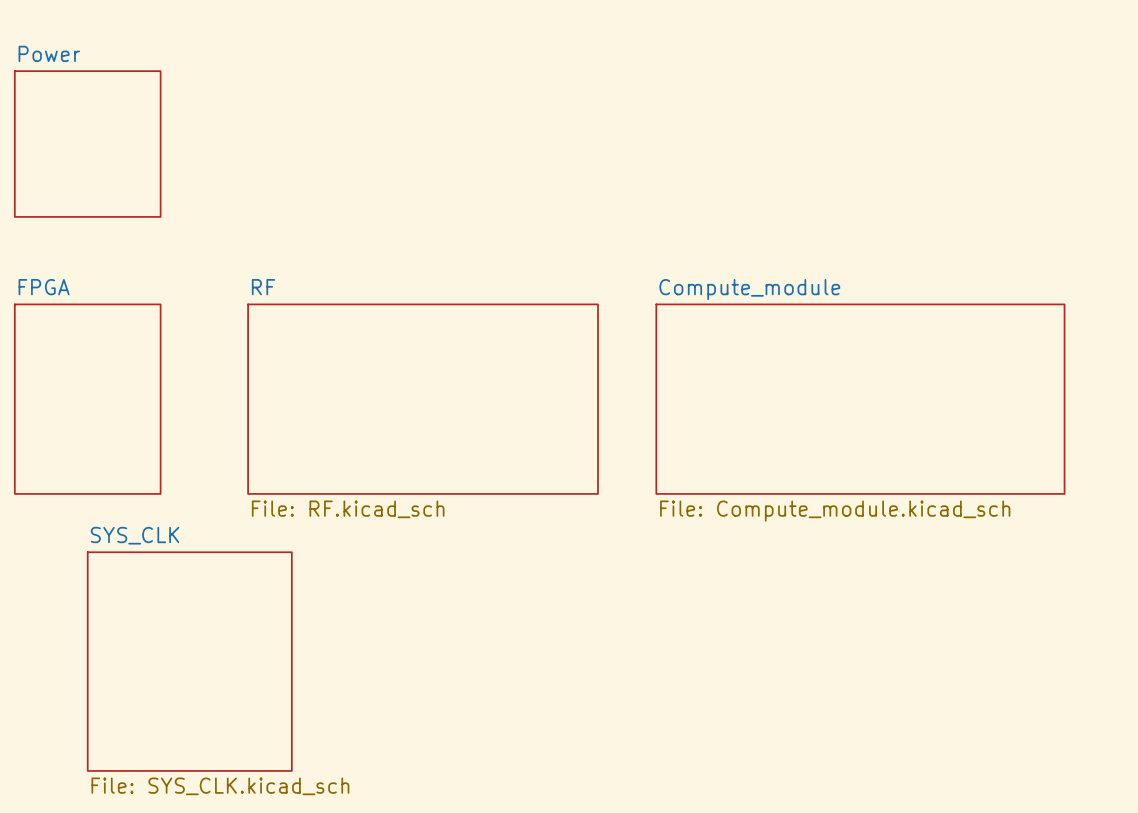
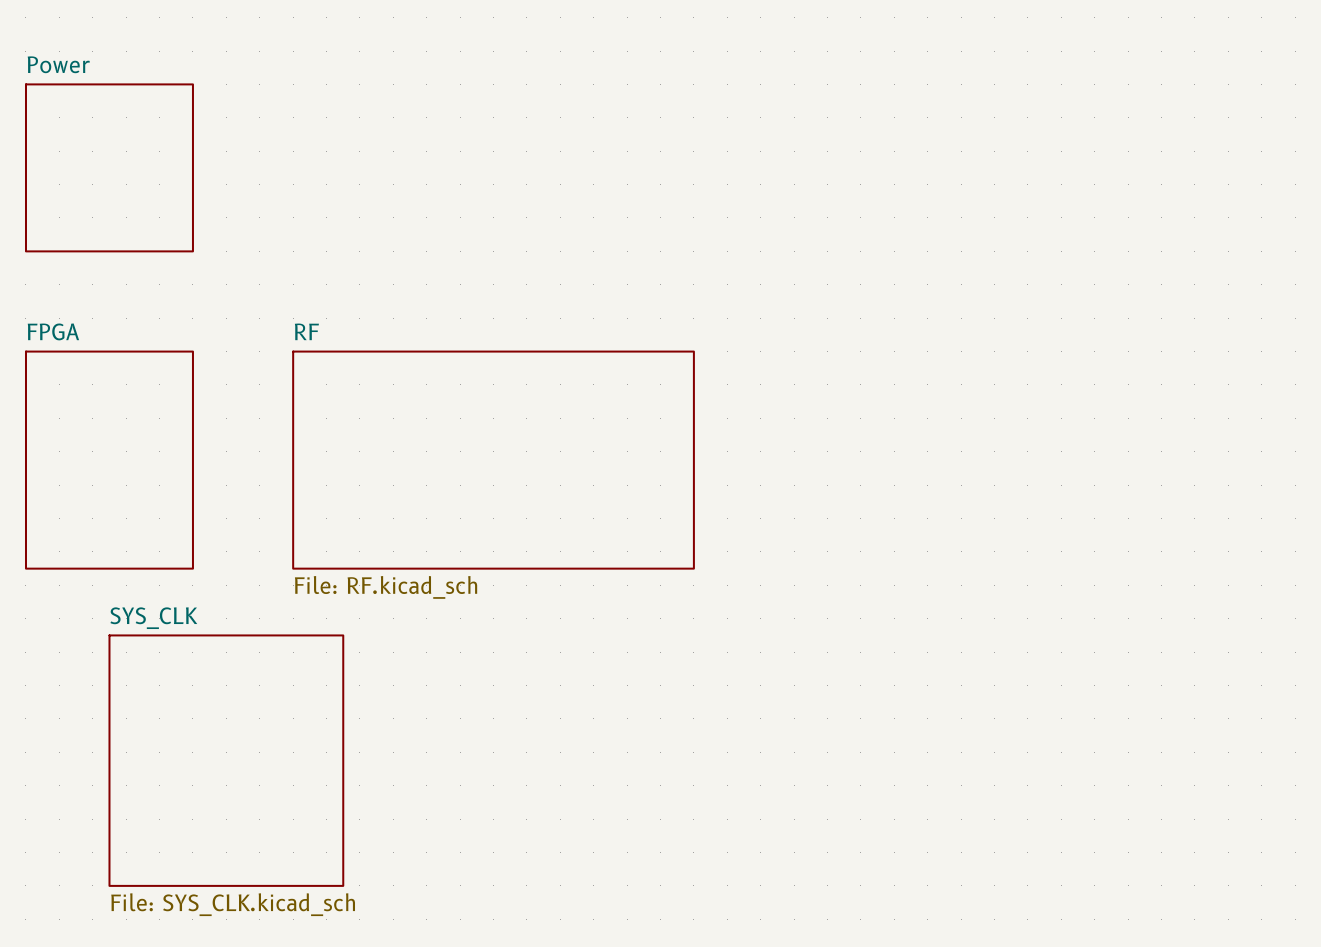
sheet Compute_module: File: Compute_module.kicad_sch (860, 399) -> none

